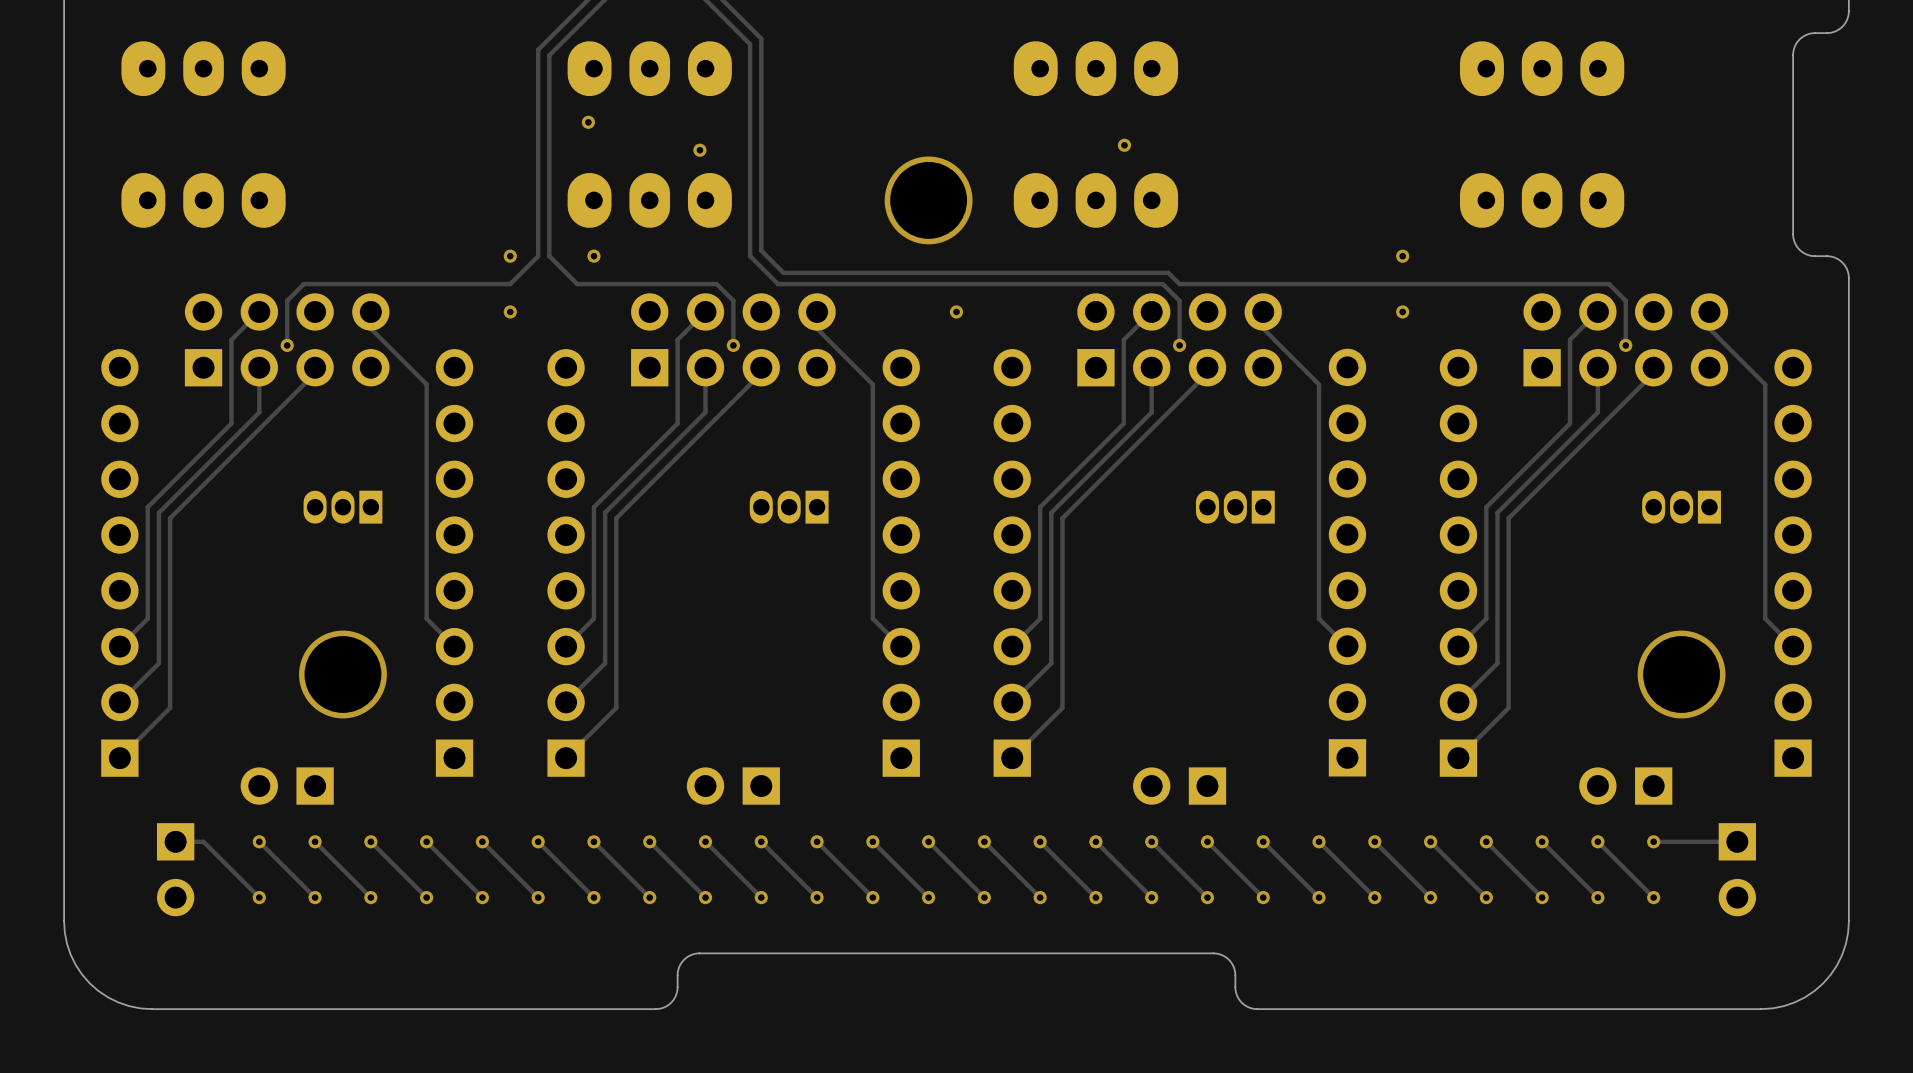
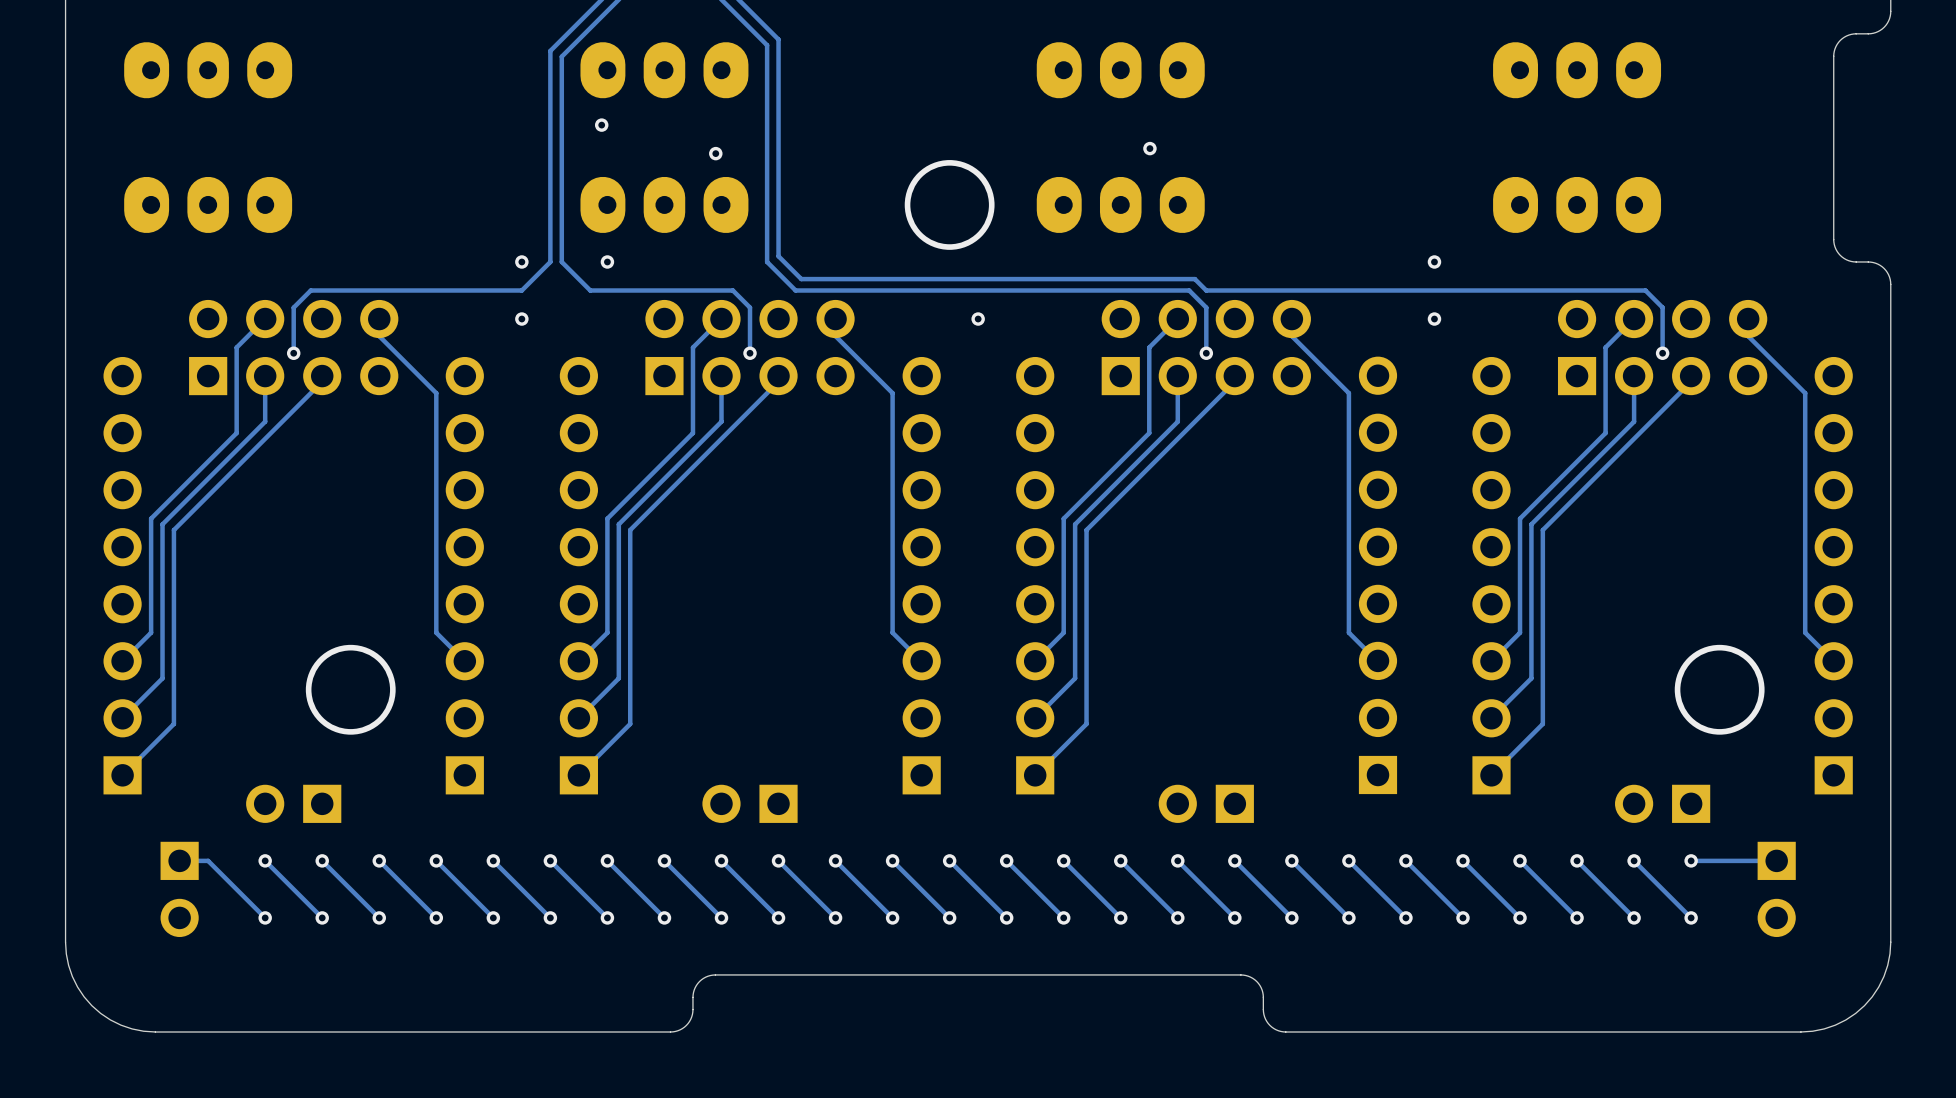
part: (342, 507) -> none
part: (789, 507) -> none
part: (1235, 507) -> none
part: (1681, 507) -> none

